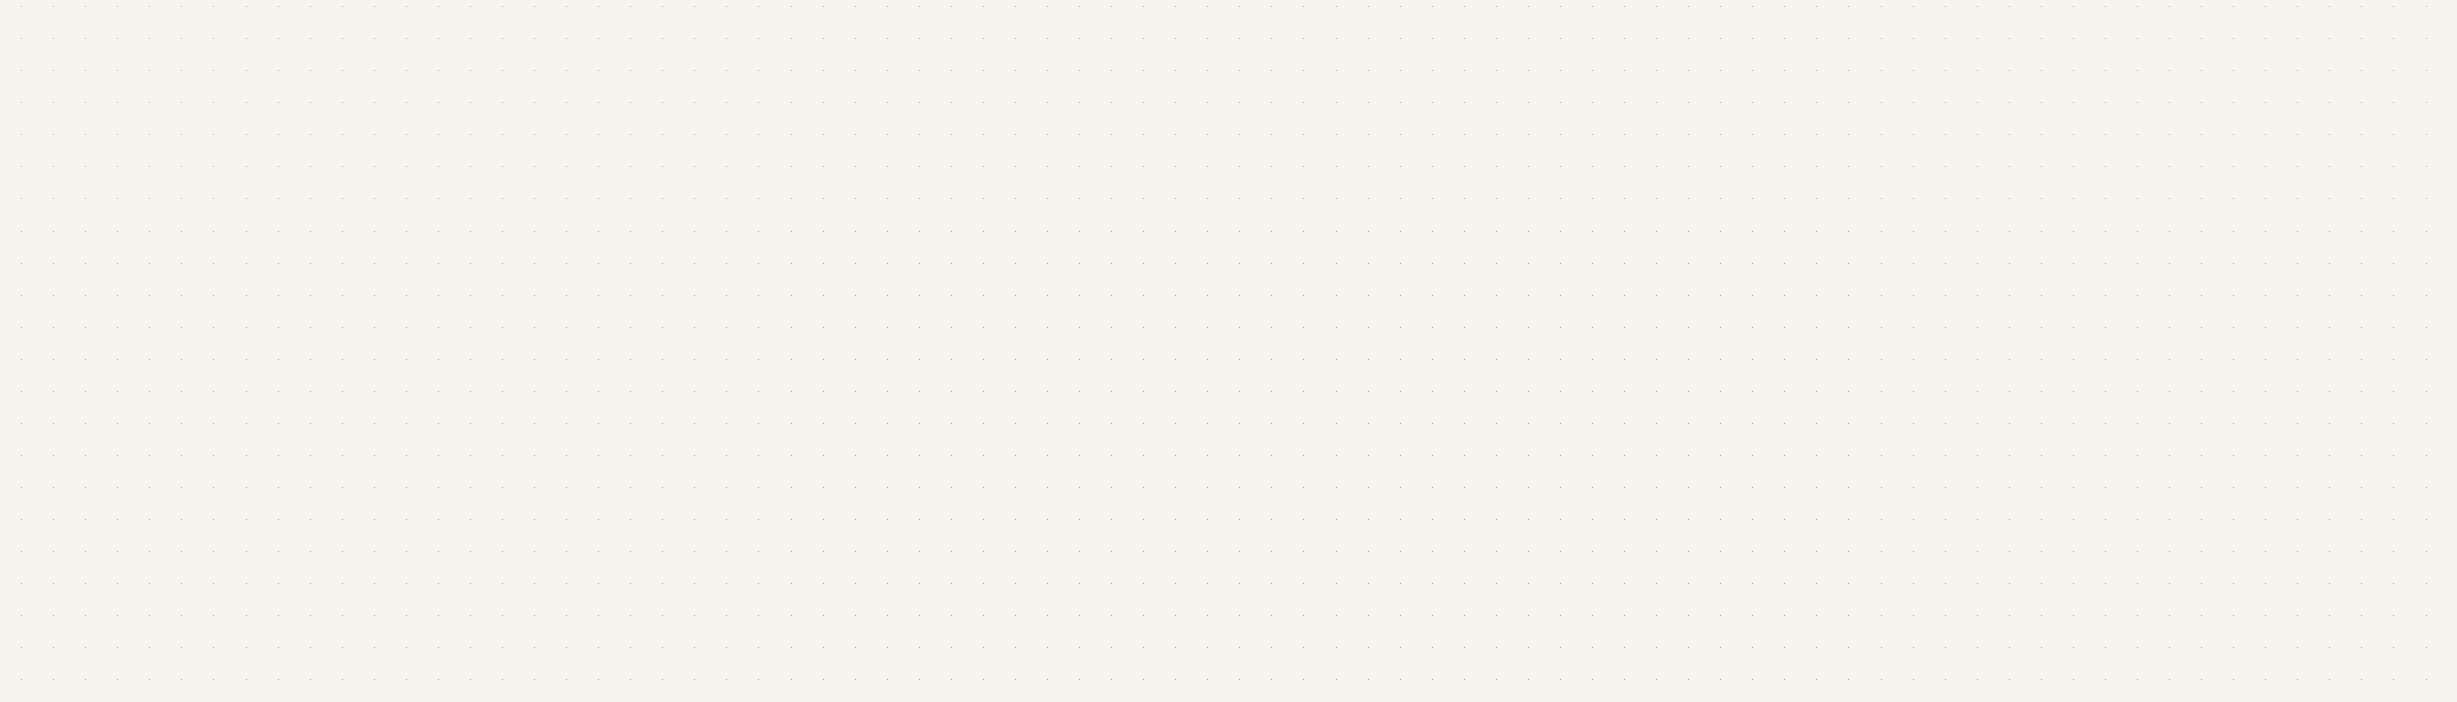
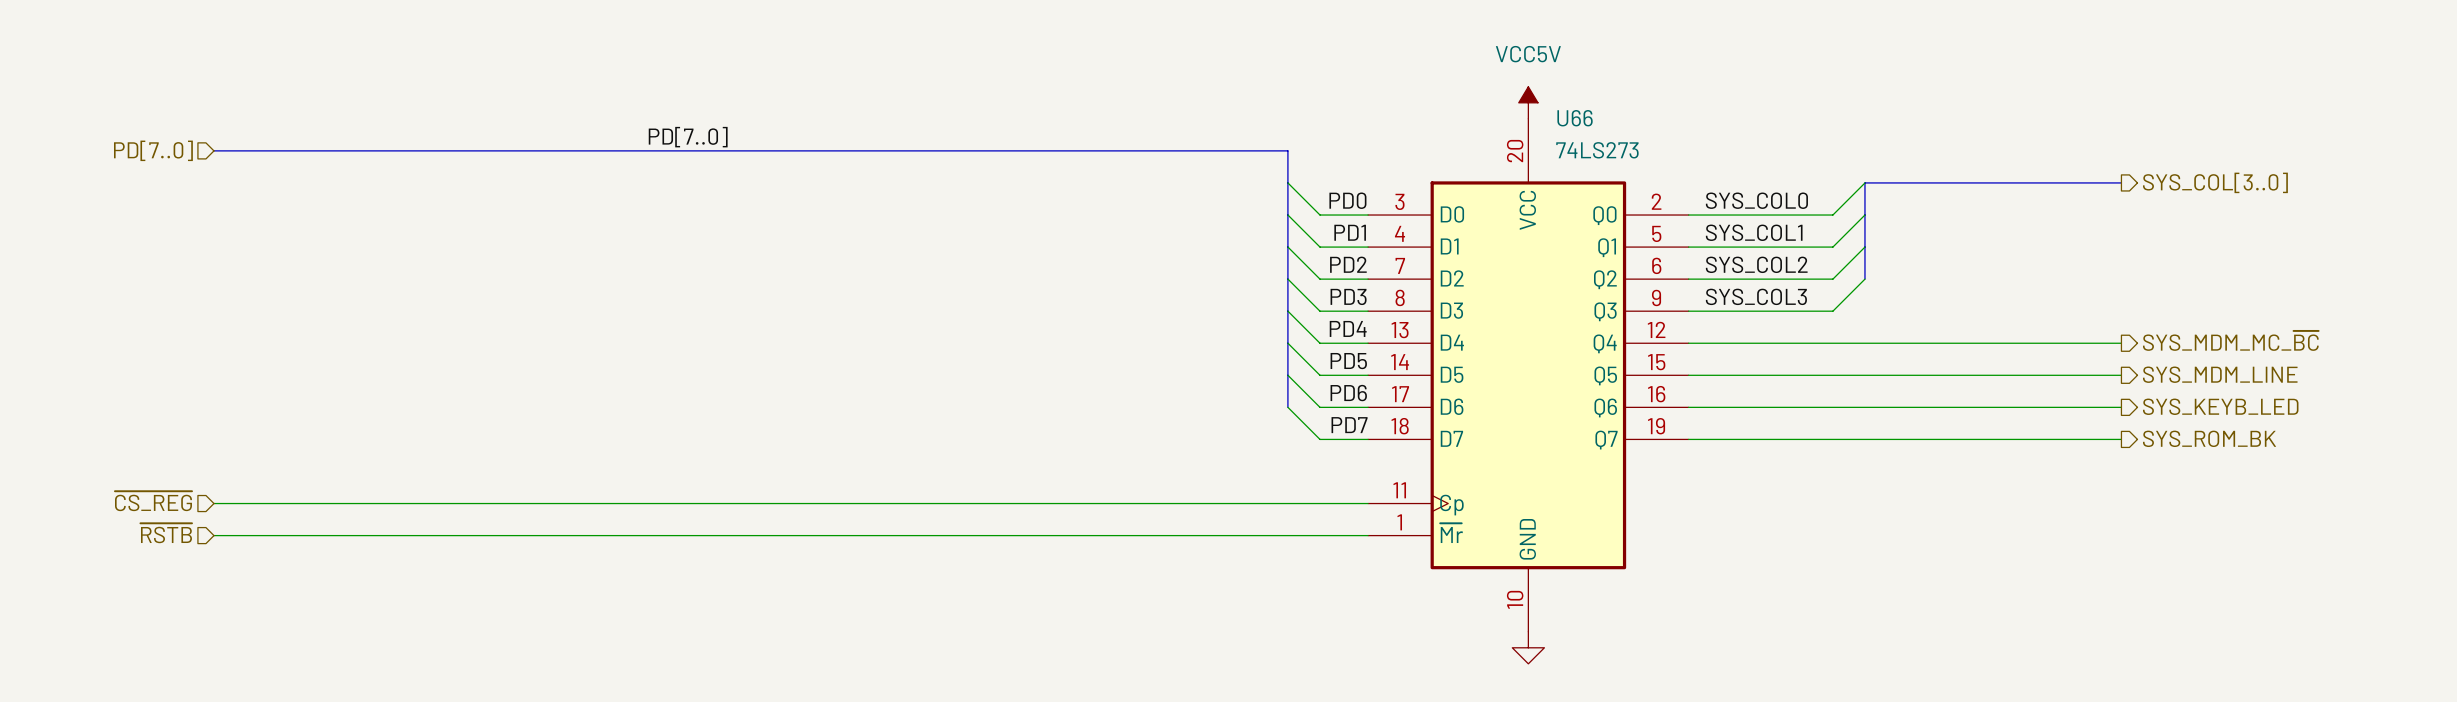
power symbol: none -> VCC5V (1528, 102)
label: none -> PD[7..0] (688, 137)
bus: none -> (213, 150) (1287, 150) (1287, 407)
hierarchical label: none -> PD[7..0] (153, 150)
wire: none -> (1287, 182) (1319, 215) (1368, 215)
wire: none -> (1864, 182) (1832, 215) (1688, 215)
bus: none -> (2121, 182) (1864, 182) (1864, 279)
hierarchical label: none -> SYS_COL[3..0] (2215, 182)
label: none -> PD0 (1347, 200)
label: none -> SYS_COL0 (1756, 200)
wire: none -> (1287, 215) (1319, 247) (1368, 247)
wire: none -> (1864, 215) (1832, 247) (1688, 247)
label: none -> PD1 (1350, 232)
label: none -> SYS_COL1 (1754, 232)
wire: none -> (1287, 247) (1319, 279) (1368, 279)
wire: none -> (1864, 247) (1832, 279) (1688, 279)
label: none -> PD2 (1348, 264)
label: none -> SYS_COL2 (1756, 264)
wire: none -> (1287, 279) (1319, 311) (1368, 311)
wire: none -> (1864, 279) (1832, 311) (1688, 311)
label: none -> PD3 (1348, 296)
label: none -> SYS_COL3 (1756, 296)
wire: none -> (1287, 311) (1319, 343) (1368, 343)
label: none -> PD4 (1348, 328)
wire: none -> (1287, 343) (1319, 375) (1368, 375)
wire: none -> (1688, 343) (2121, 343)
hierarchical label: none -> SYS_MDM_MC_~{BC} (2230, 340)
label: none -> PD5 (1348, 361)
wire: none -> (1287, 375) (1319, 407) (1368, 407)
U66: none -> 74LS273 (1528, 375)
wire: none -> (1688, 375) (2121, 375)
hierarchical label: none -> SYS_MDM_LINE (2220, 374)
label: none -> PD6 (1348, 393)
wire: none -> (1287, 407) (1319, 439) (1368, 439)
wire: none -> (1688, 407) (2121, 407)
hierarchical label: none -> SYS_KEYB_LED (2220, 406)
label: none -> PD7 (1349, 425)
wire: none -> (1688, 439) (2121, 439)
hierarchical label: none -> SYS_ROM_BK (2209, 438)
hierarchical label: none -> ~{CS_REG} (153, 501)
wire: none -> (213, 503) (1368, 503)
hierarchical label: none -> ~{RSTB} (166, 533)
wire: none -> (213, 535) (1368, 535)
power symbol: none -> (1528, 647)

